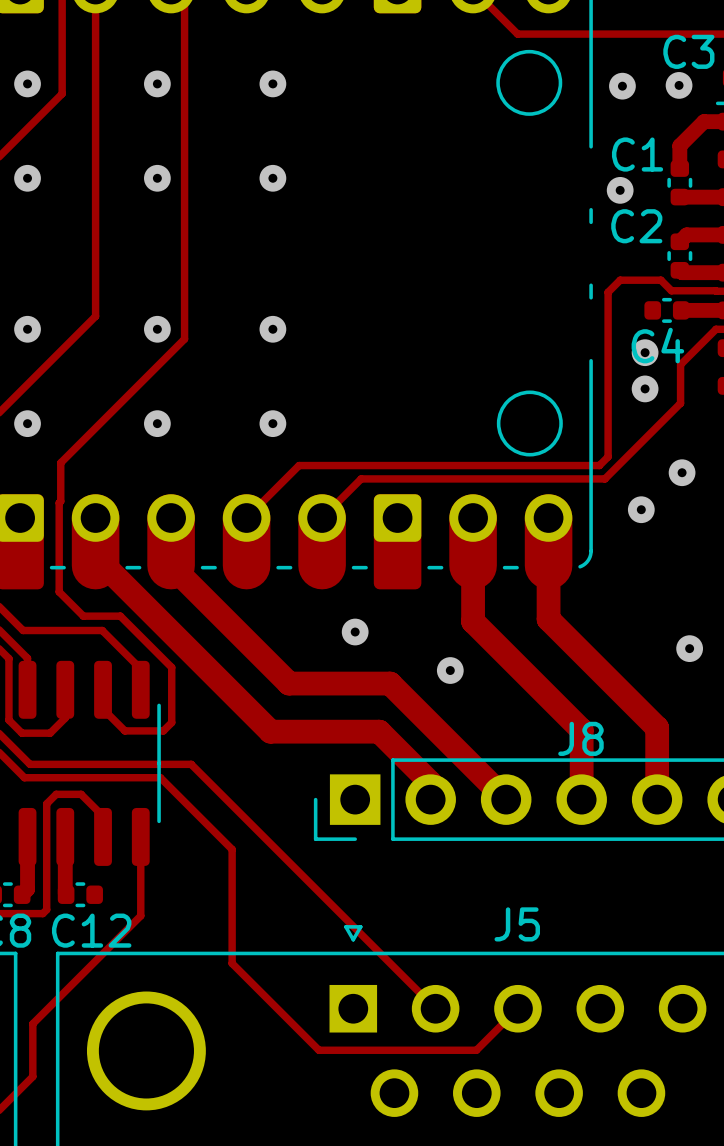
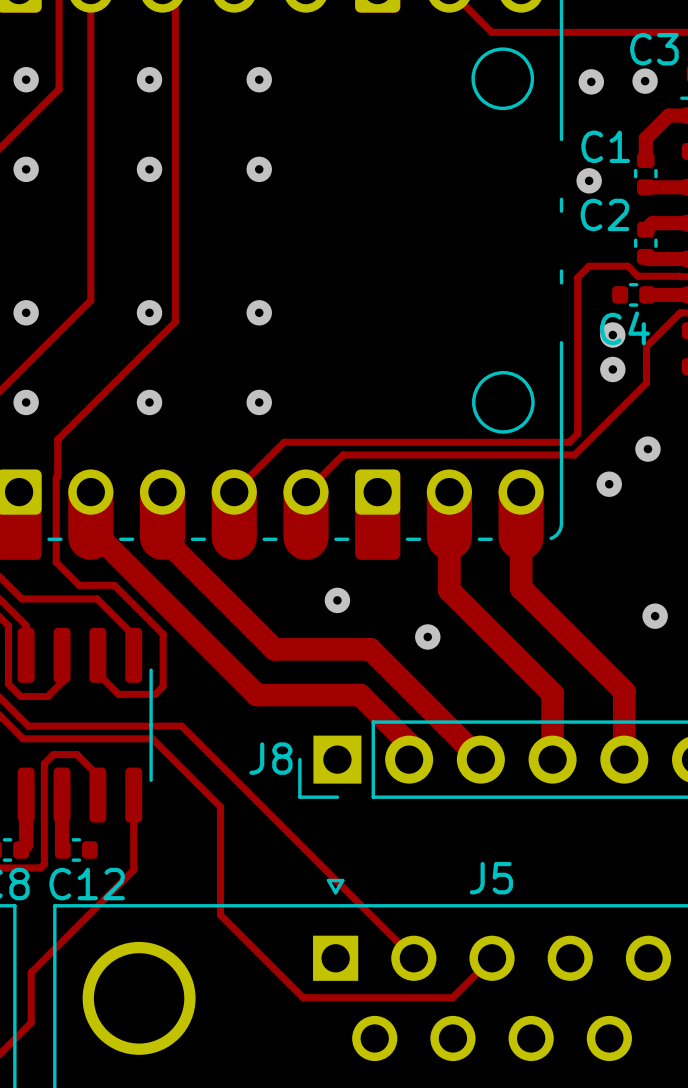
J8 name position: J8 (580, 738) -> J8 (270, 758)

